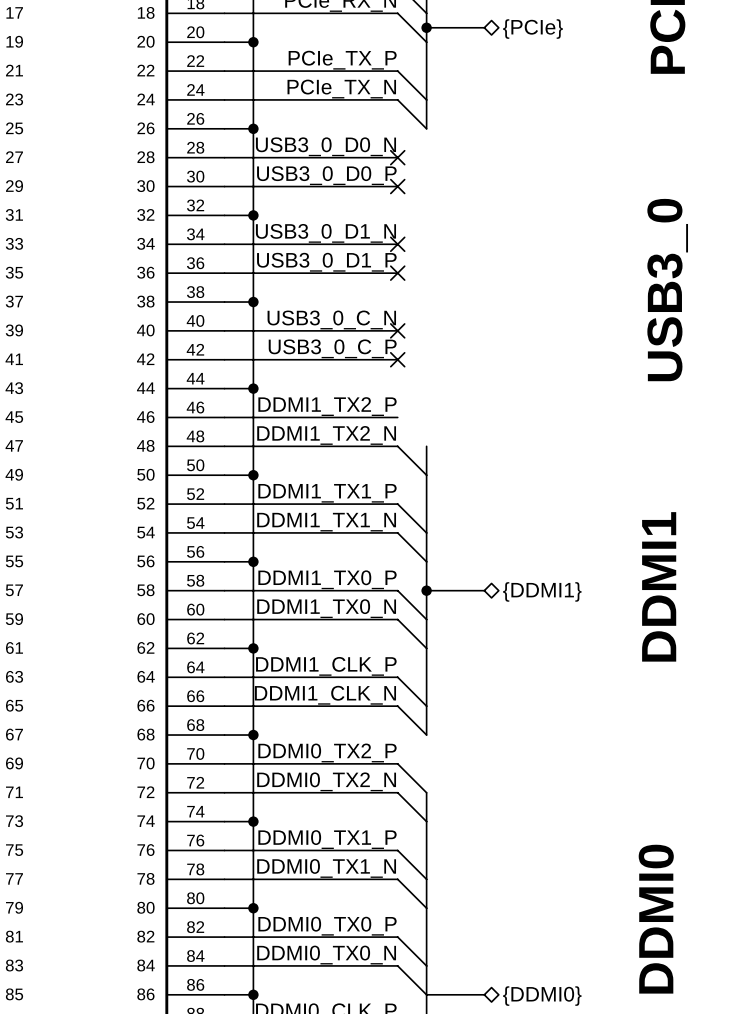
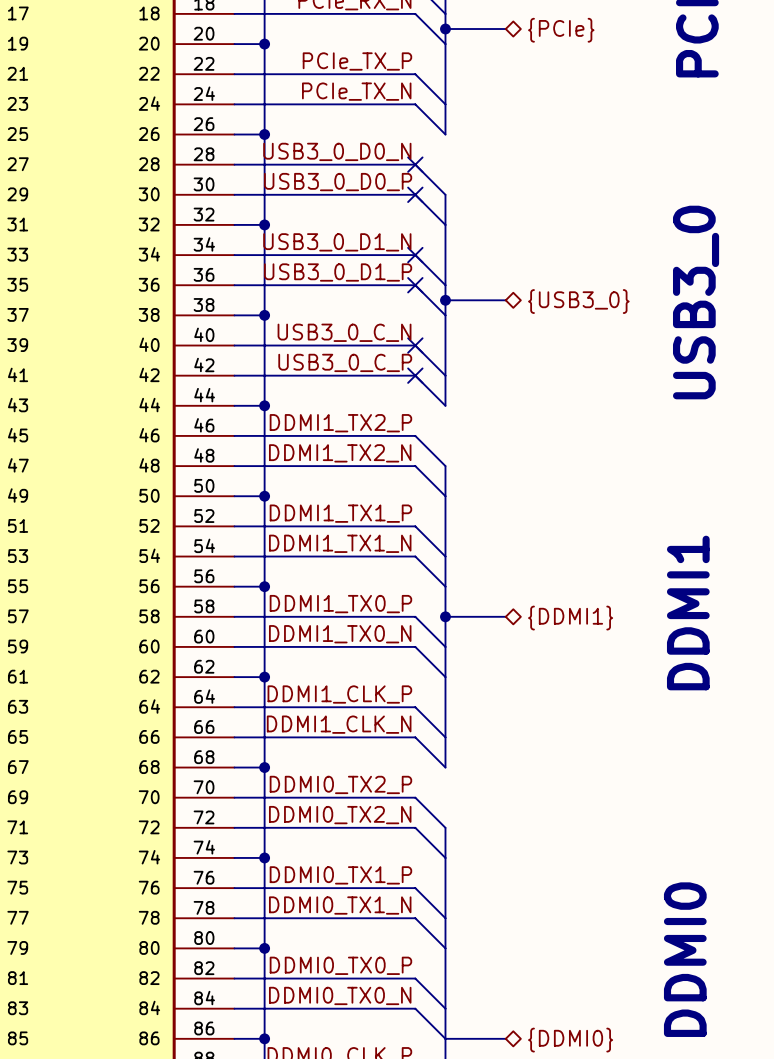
wire: none -> (415, 164) (445, 194)
wire: none -> (415, 194) (445, 224)
bus: none -> (445, 194) (445, 405)
wire: none -> (415, 255) (445, 285)
wire: none -> (415, 285) (445, 315)
bus: none -> (445, 300) (505, 300)
junction: none -> (445, 300)
hierarchical label: none -> {USB3_0} (578, 301)
wire: none -> (415, 345) (445, 375)
wire: none -> (415, 375) (445, 405)
wire: none -> (415, 435) (445, 466)

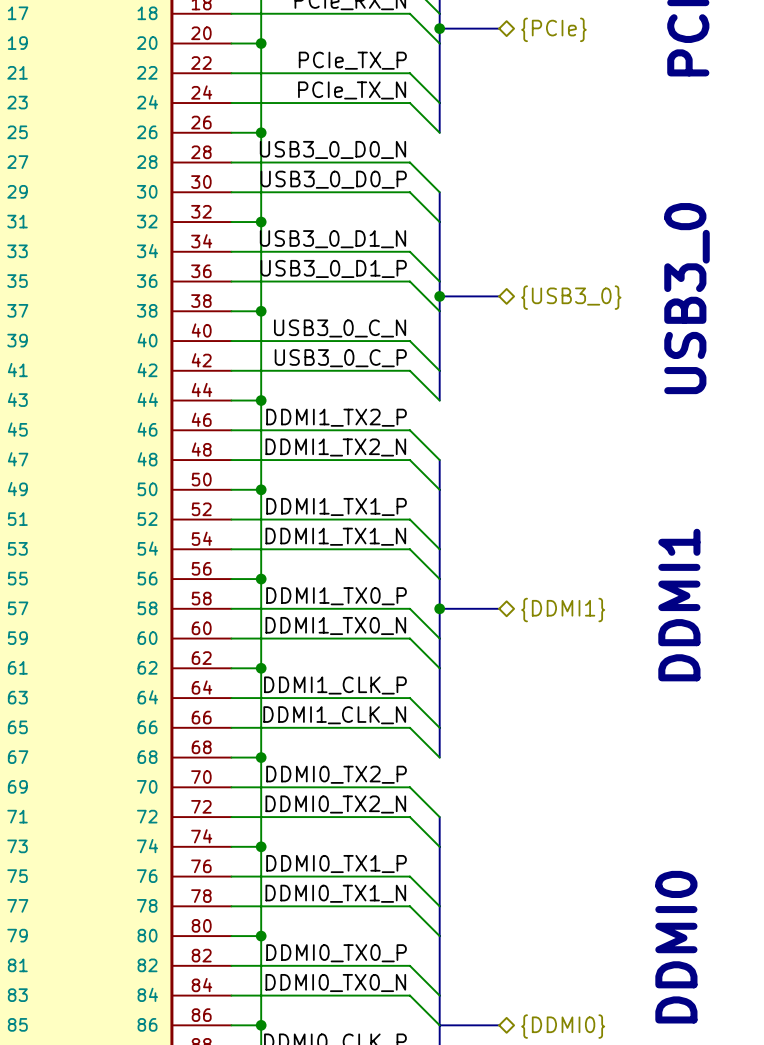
no-connect mark: (415, 164) -> none
no-connect mark: (415, 194) -> none
no-connect mark: (415, 255) -> none
no-connect mark: (415, 285) -> none
no-connect mark: (415, 345) -> none
no-connect mark: (415, 375) -> none

